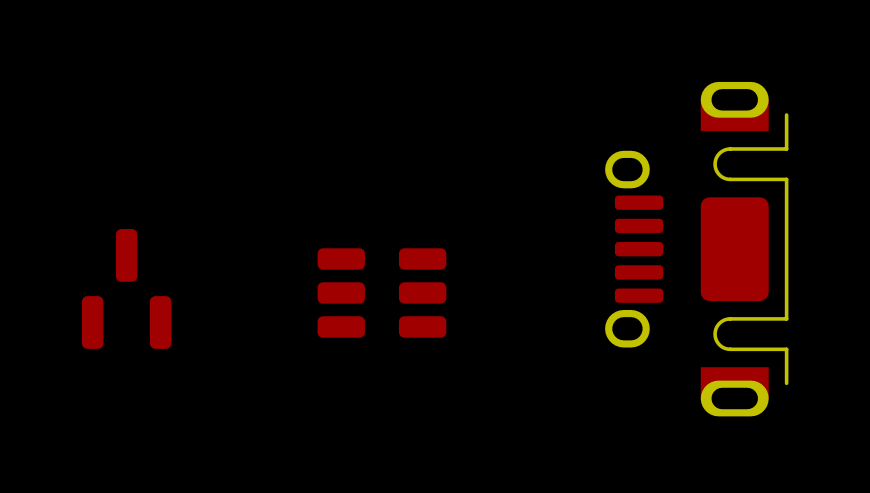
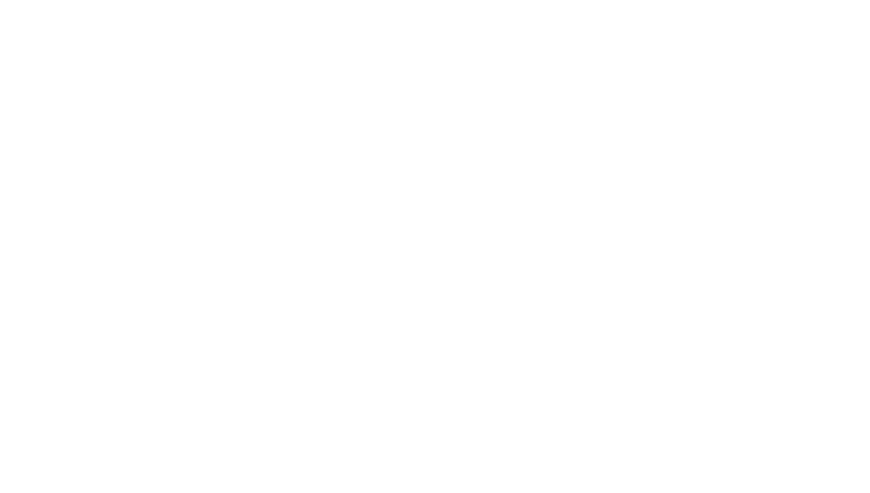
part: (696, 249) -> none
part: (126, 288) -> none
part: (381, 292) -> none

